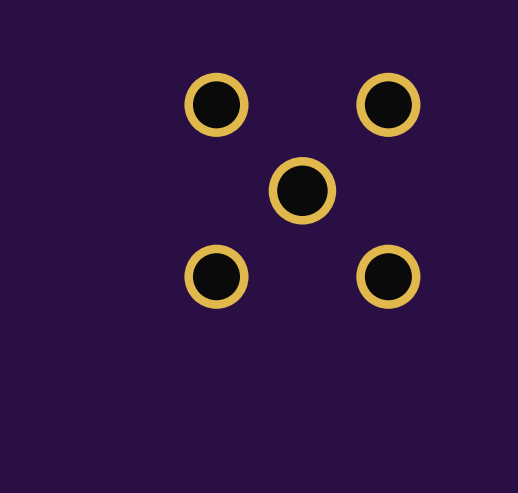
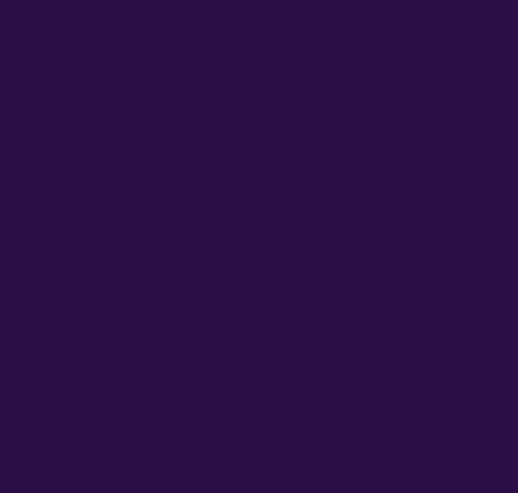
part: (302, 190) -> none

